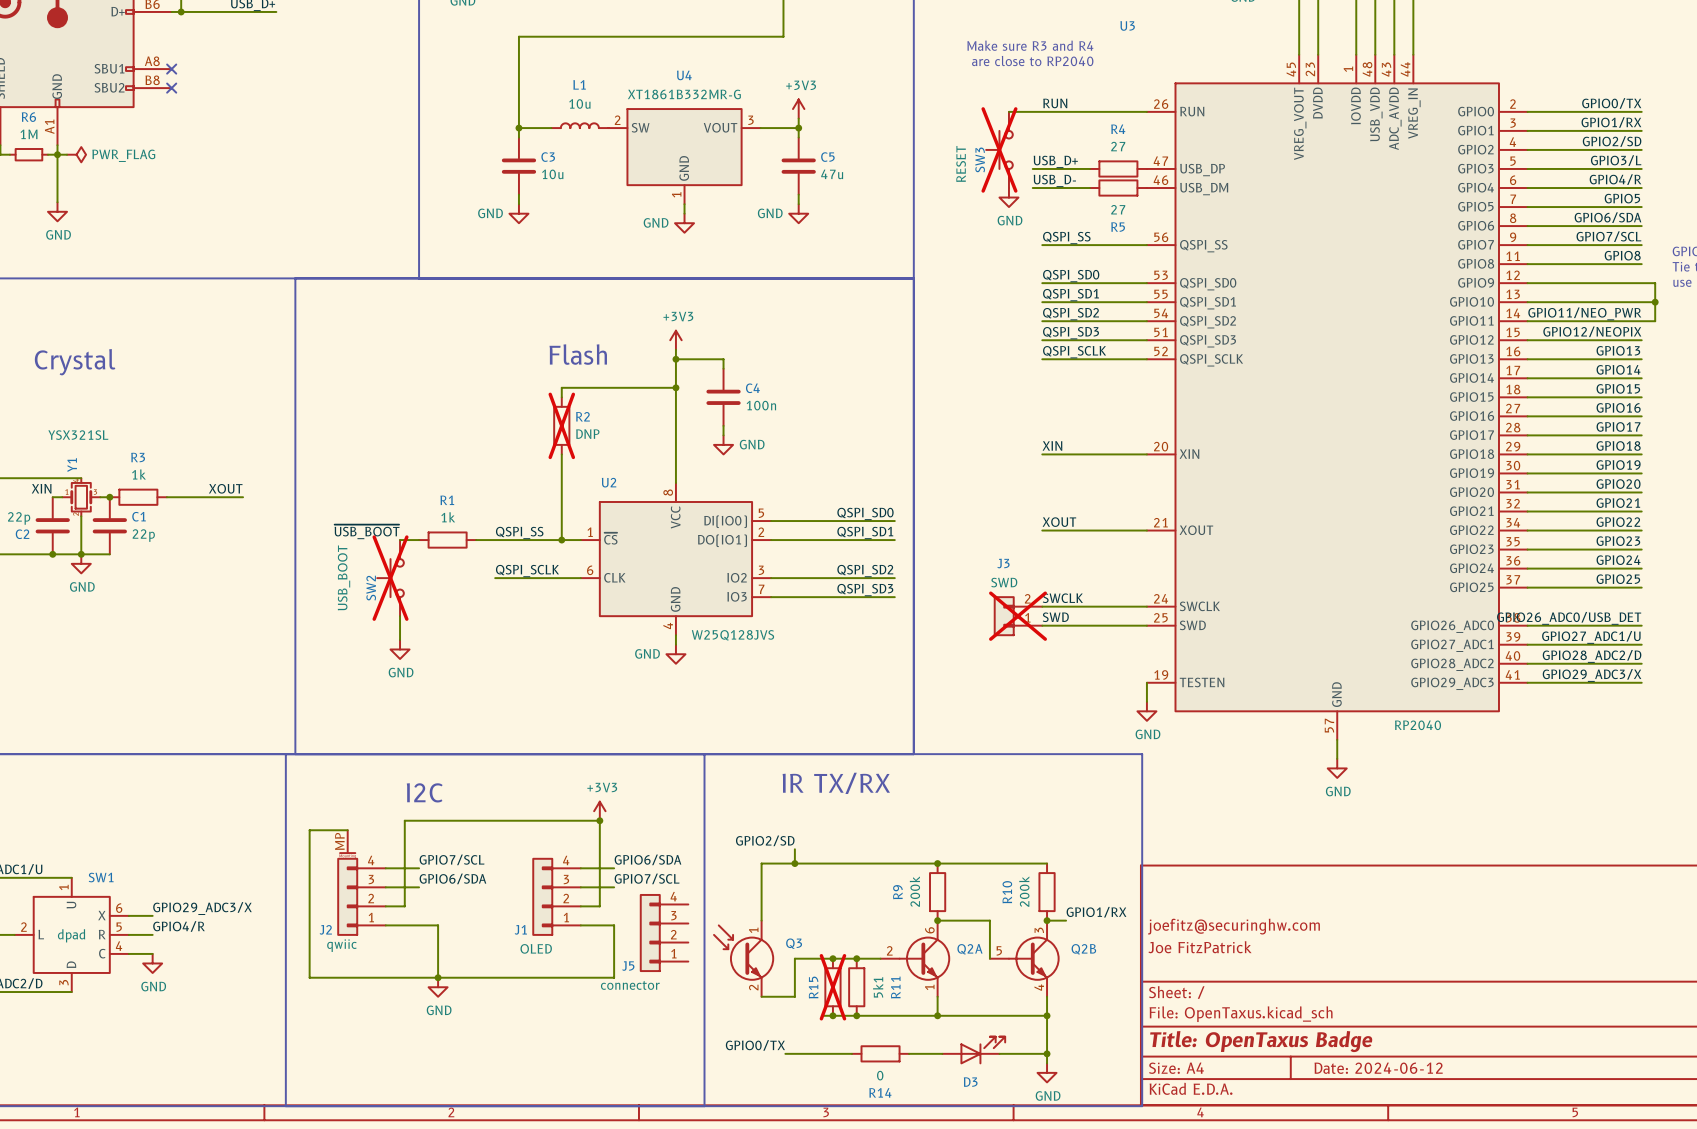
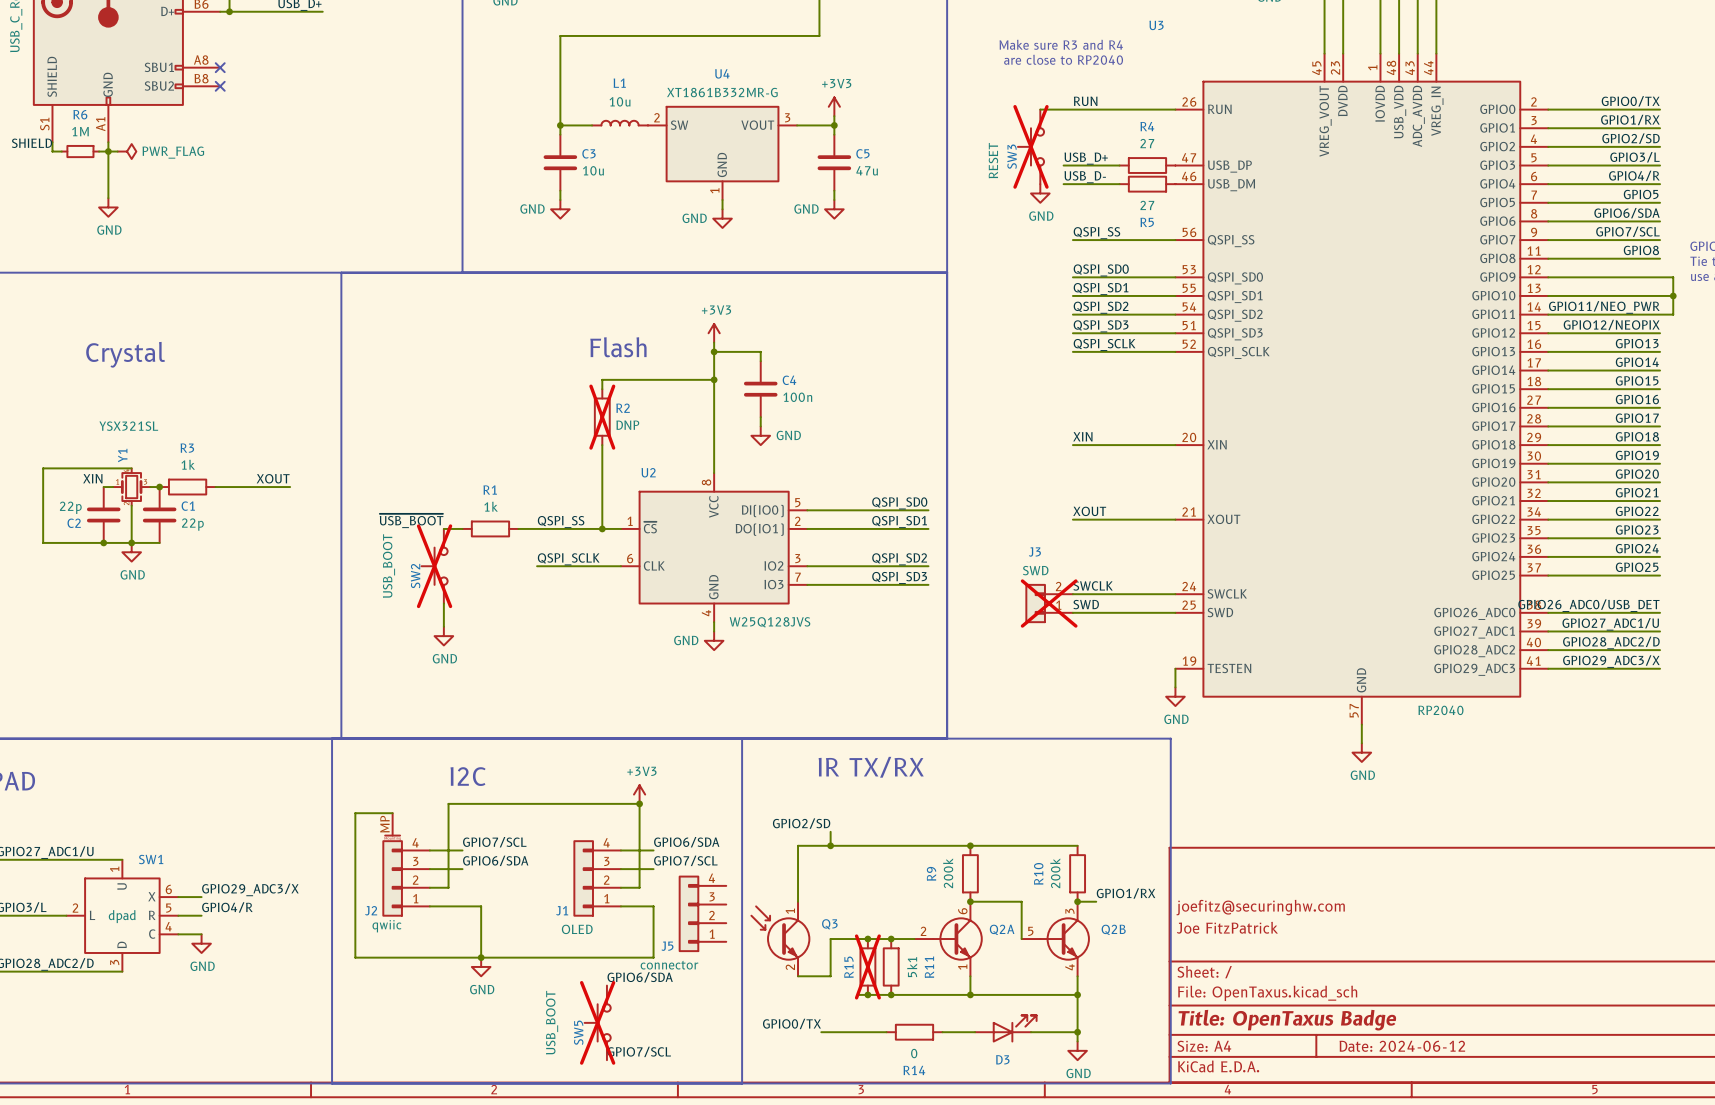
label: none -> GPIO6/SDA (640, 977)
SW5: none -> USB_BOOT (597, 1022)
label: none -> GPIO7/SCL (639, 1051)

